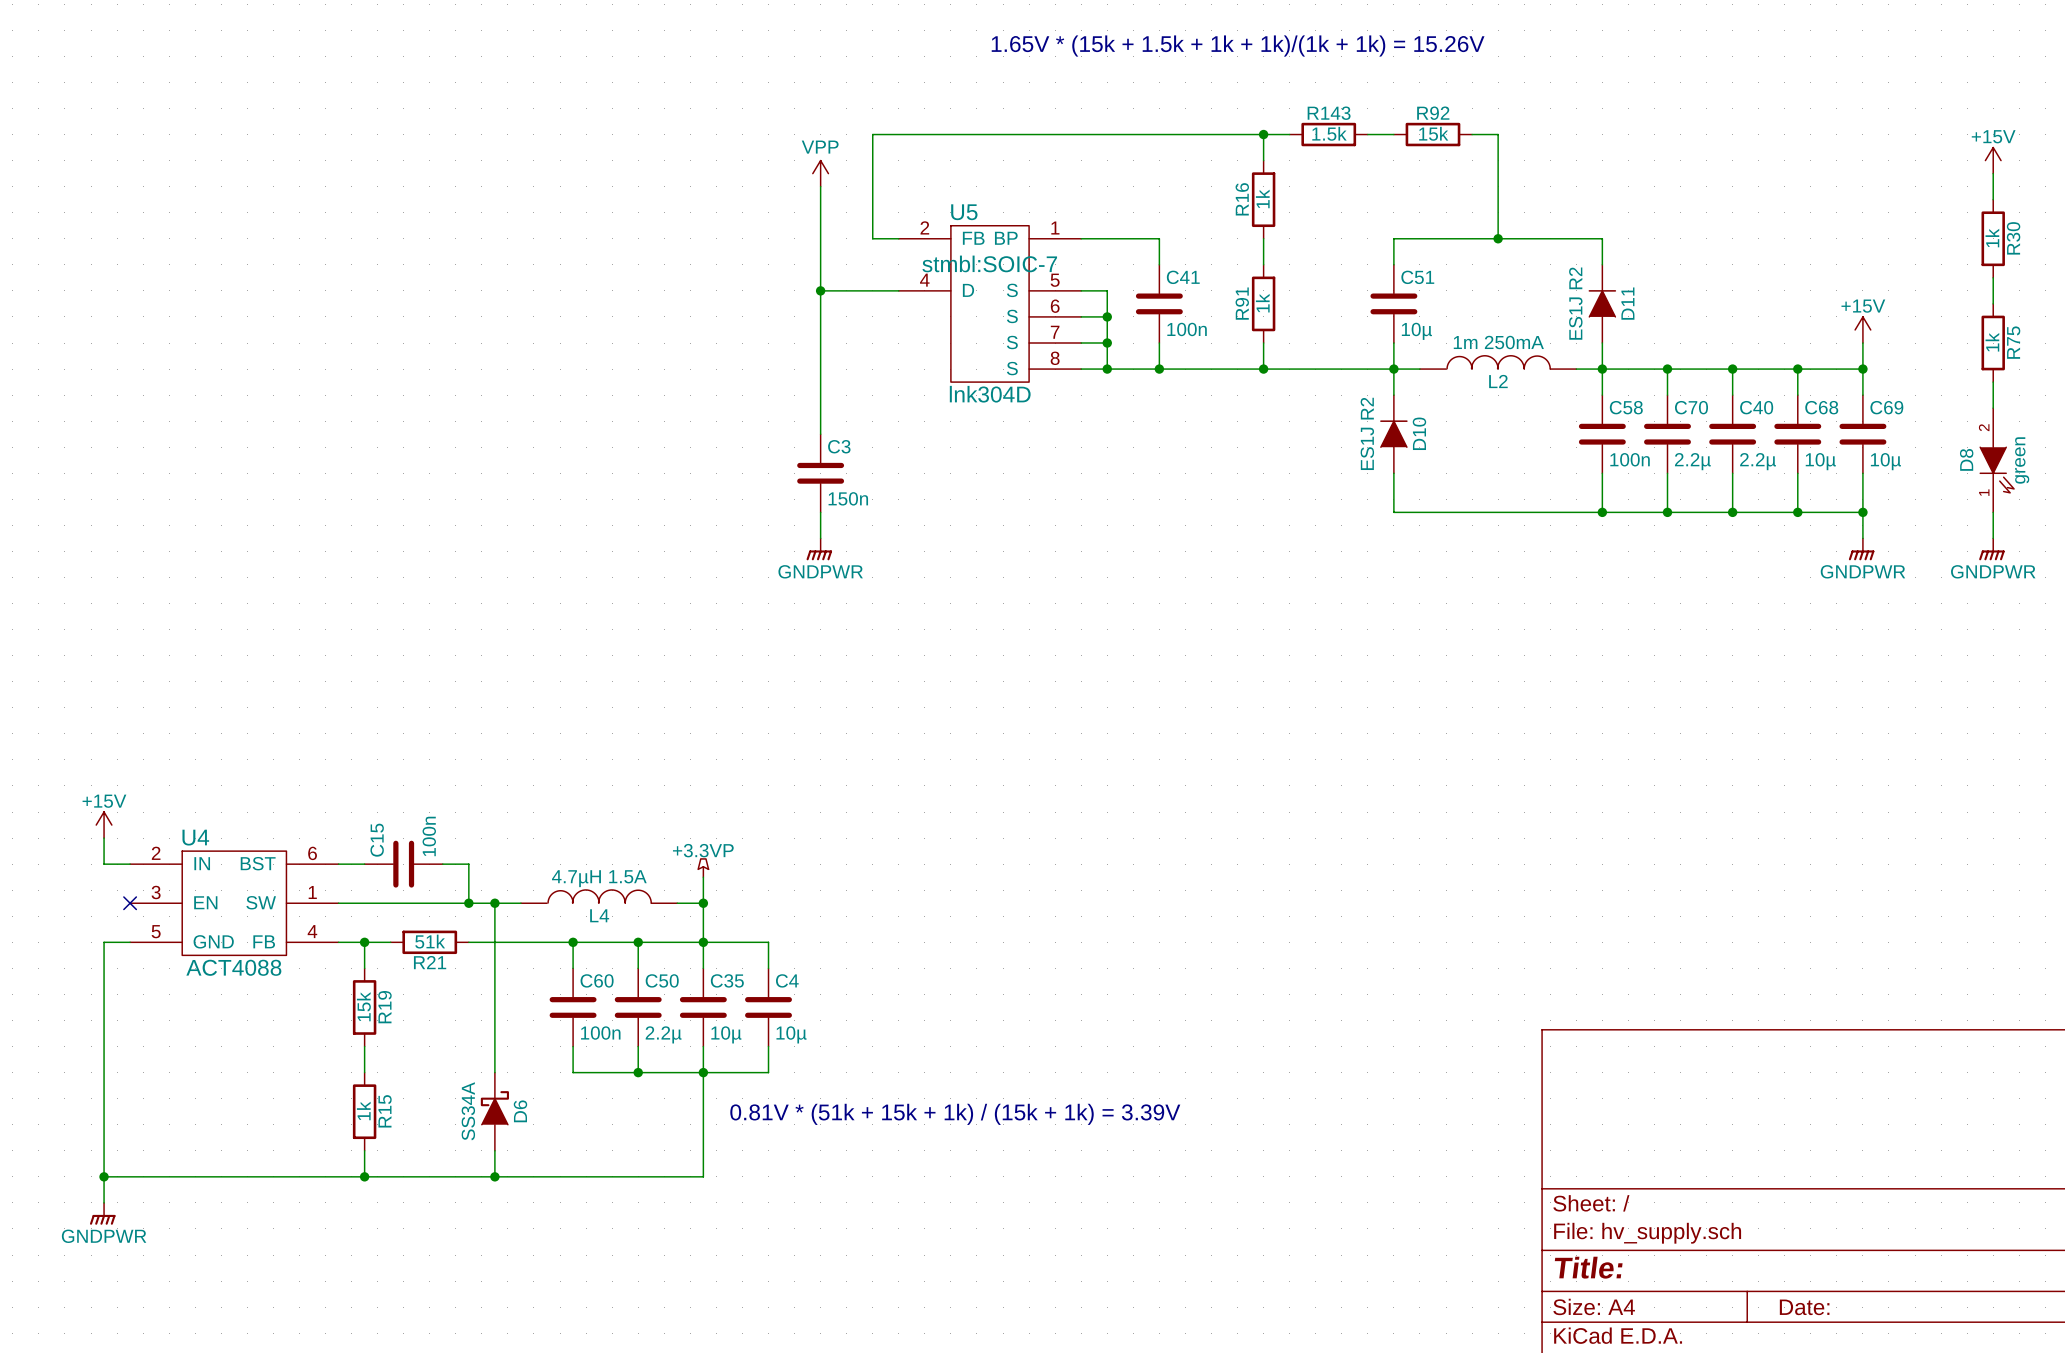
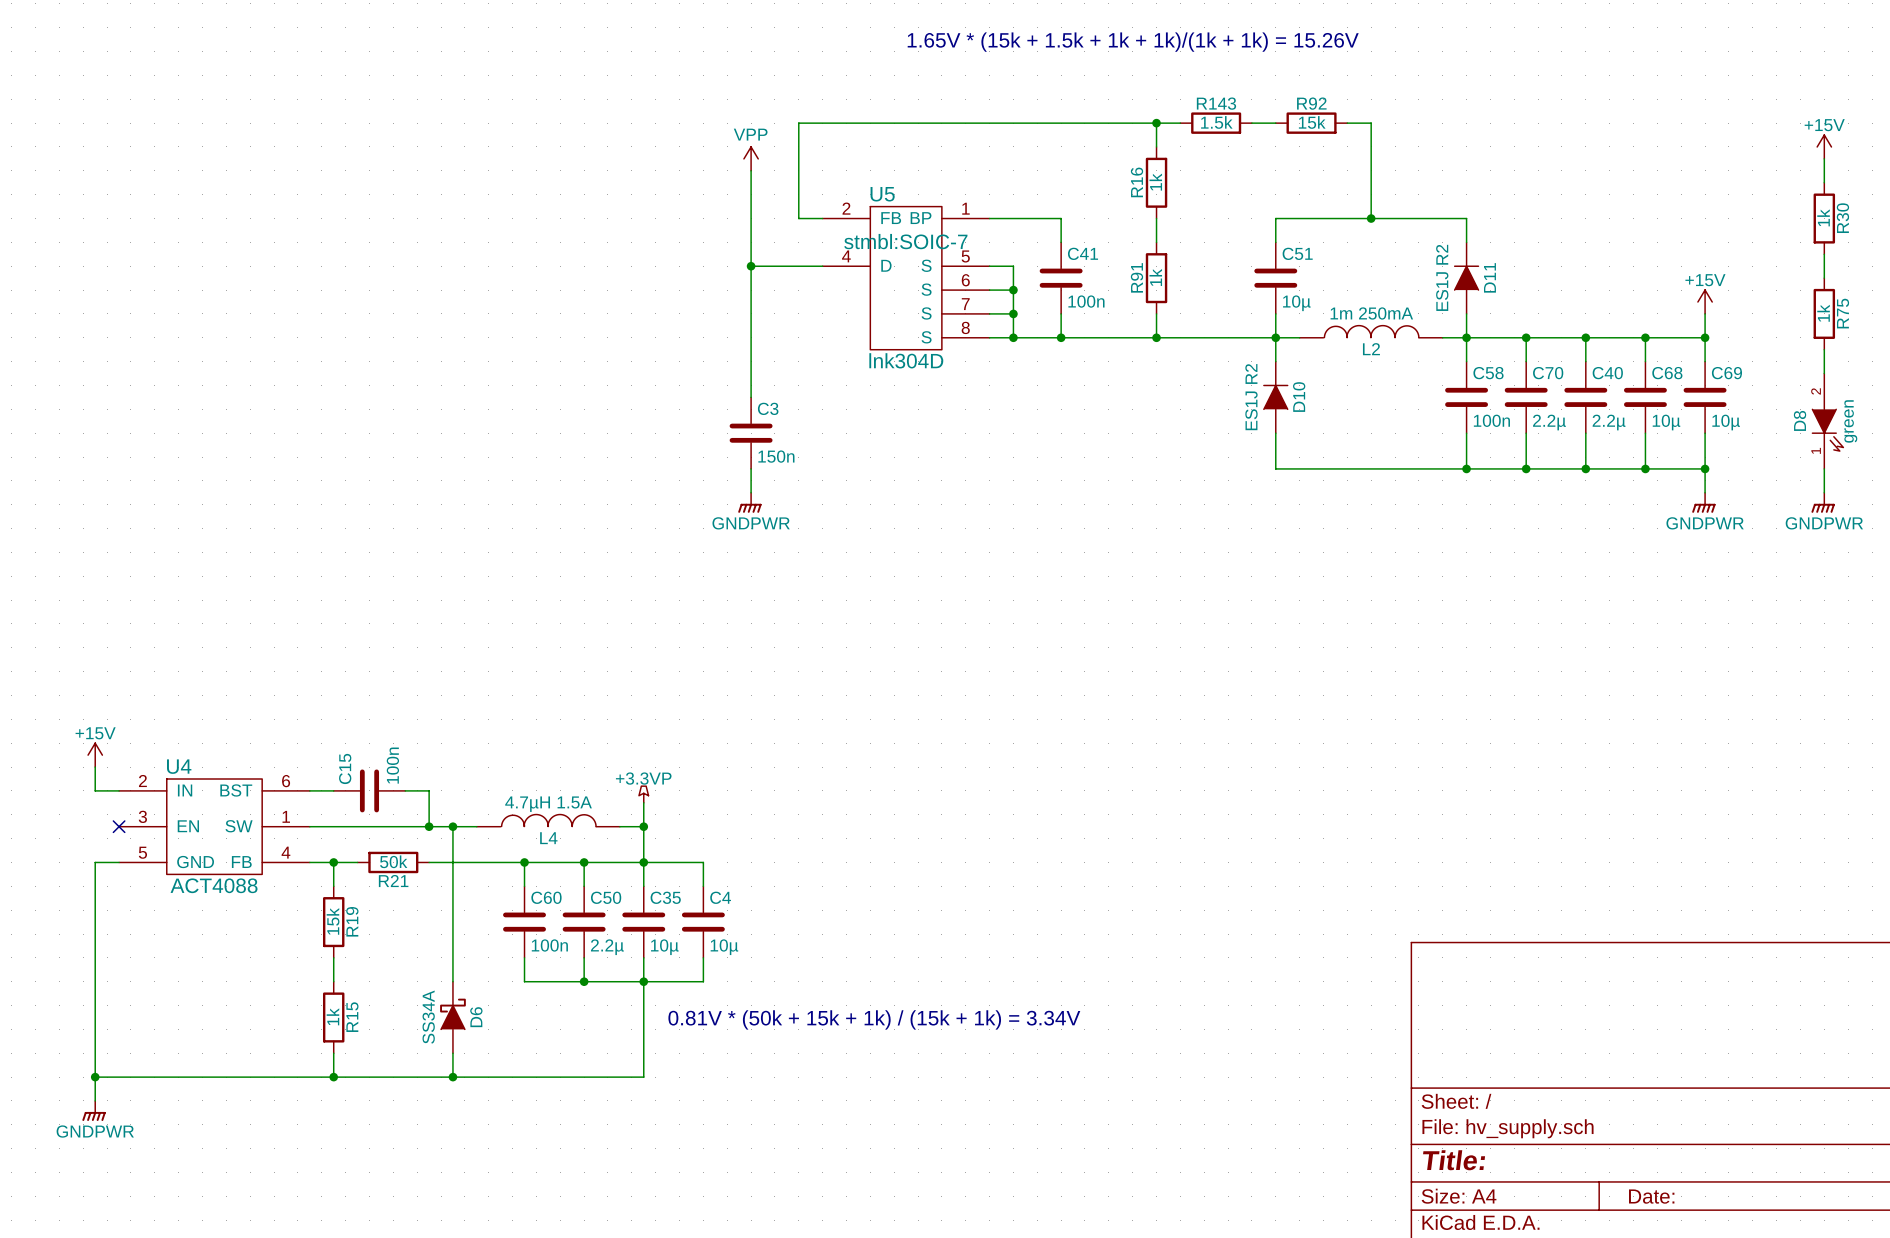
R21 value: 51k (430, 941) -> 50k (393, 861)
text: 0.81V * (51k + 15k + 1k) / (15k + 1k) = 3.39V (955, 1114) -> 0.81V * (50k + 15k + 1k) / (15k + 1k) = 3.34V (874, 1019)

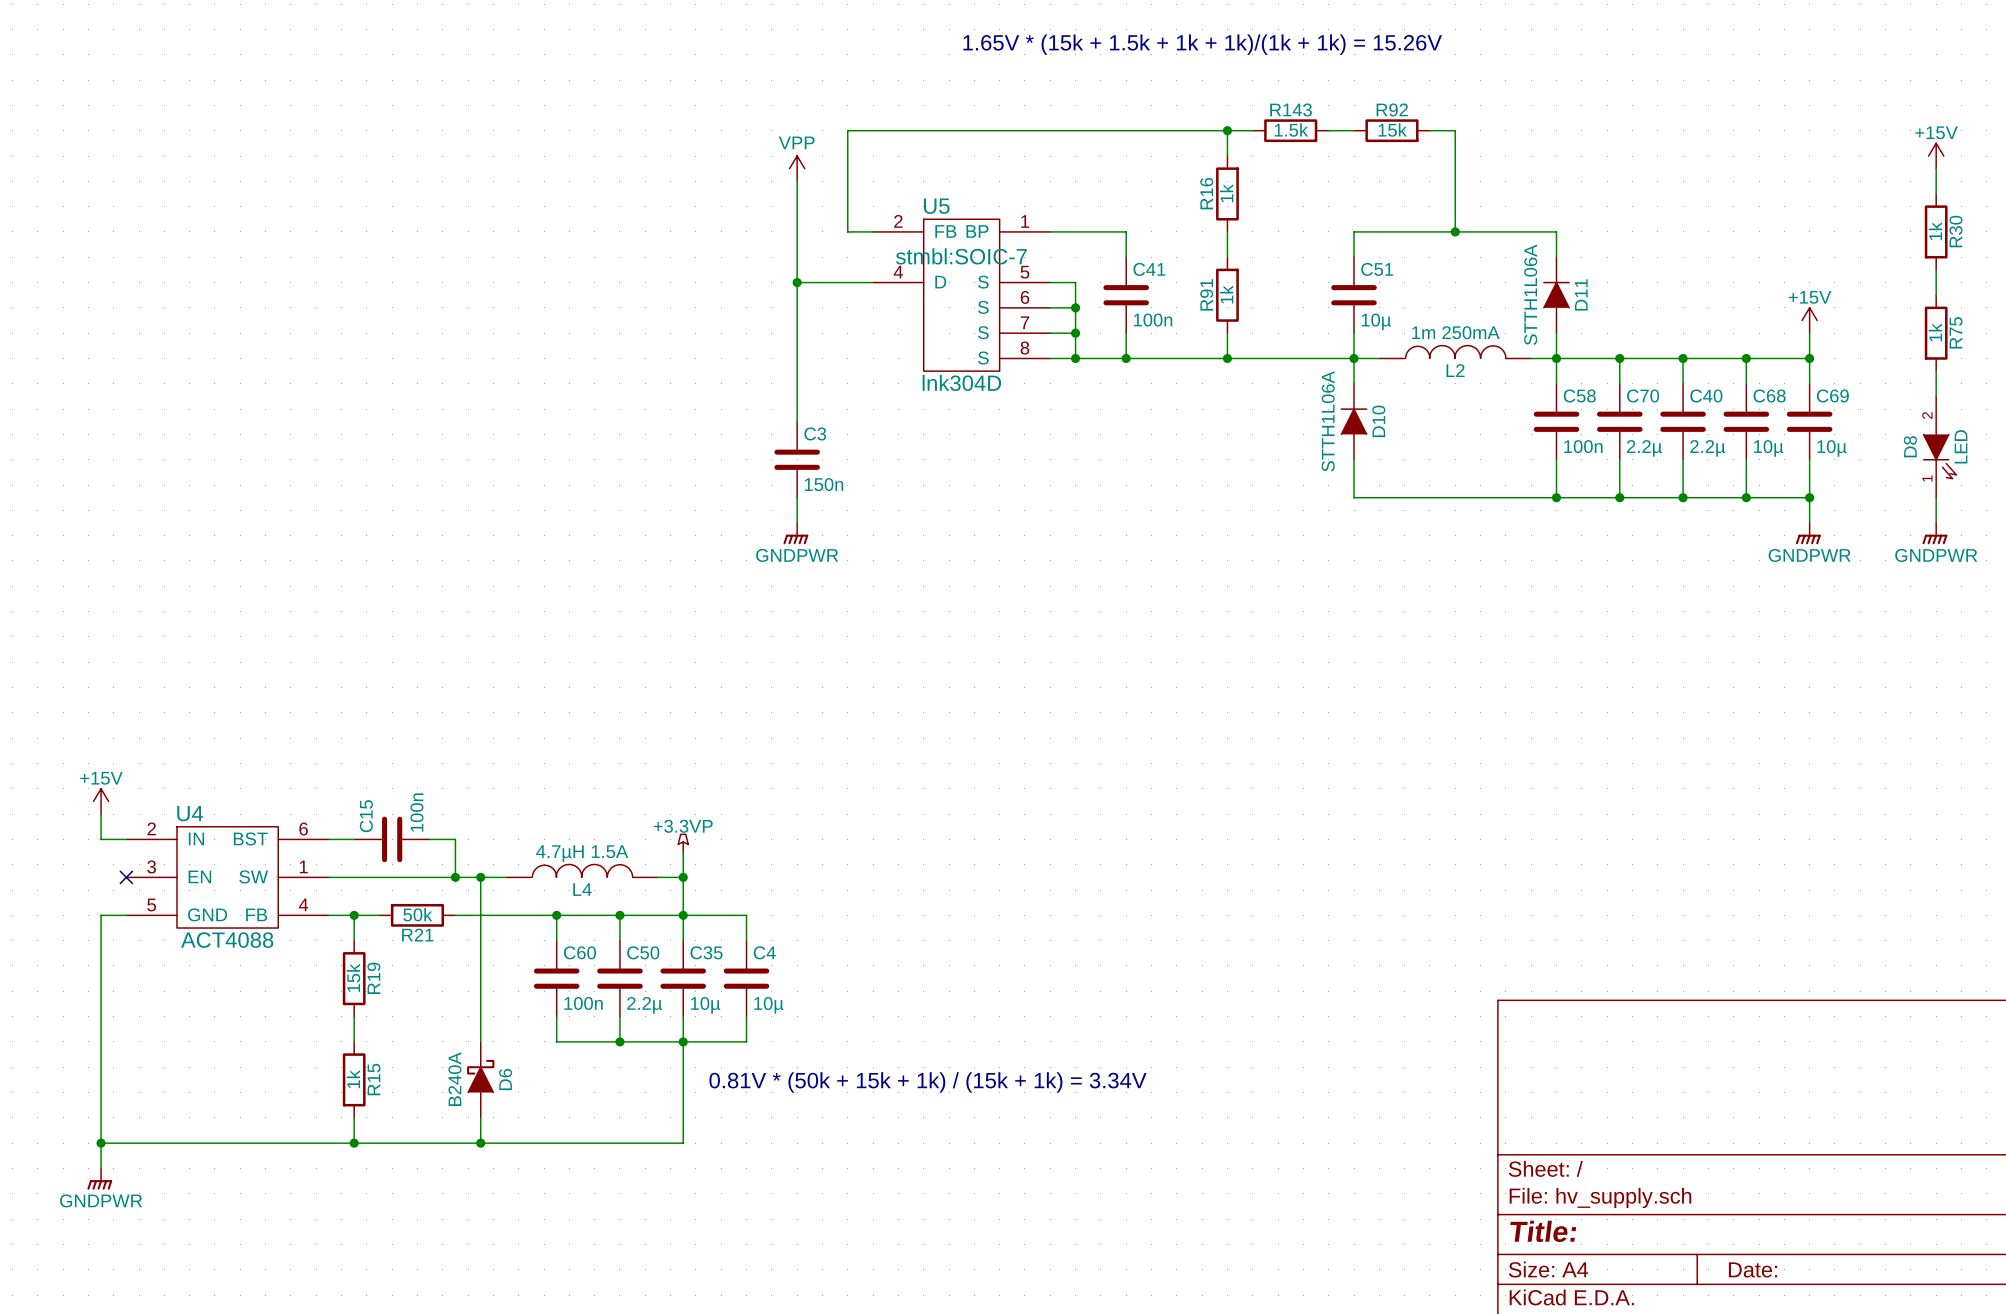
D11 value: ES1J R2 (1442, 277) -> STTH1L06A (1530, 294)
D10 value: ES1J R2 (1251, 397) -> STTH1L06A (1328, 421)
D8 value: green (1850, 421) -> LED (1961, 446)
D6 value: SS34A (428, 1017) -> B240A (454, 1079)

